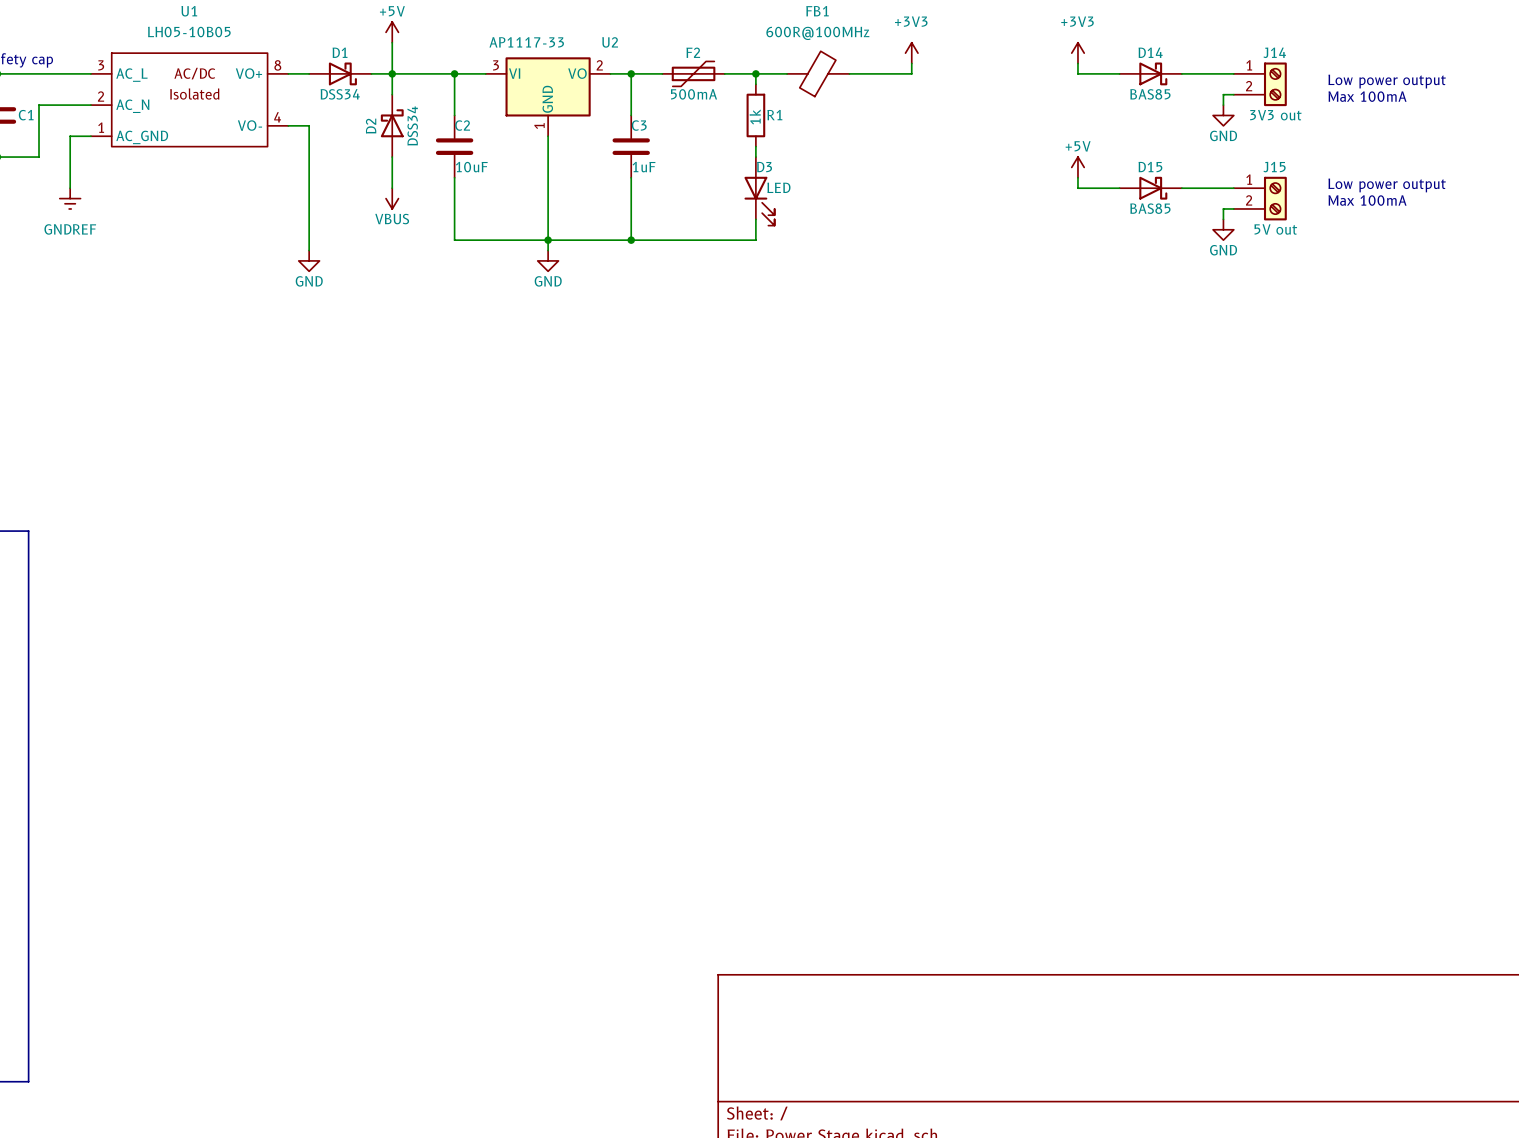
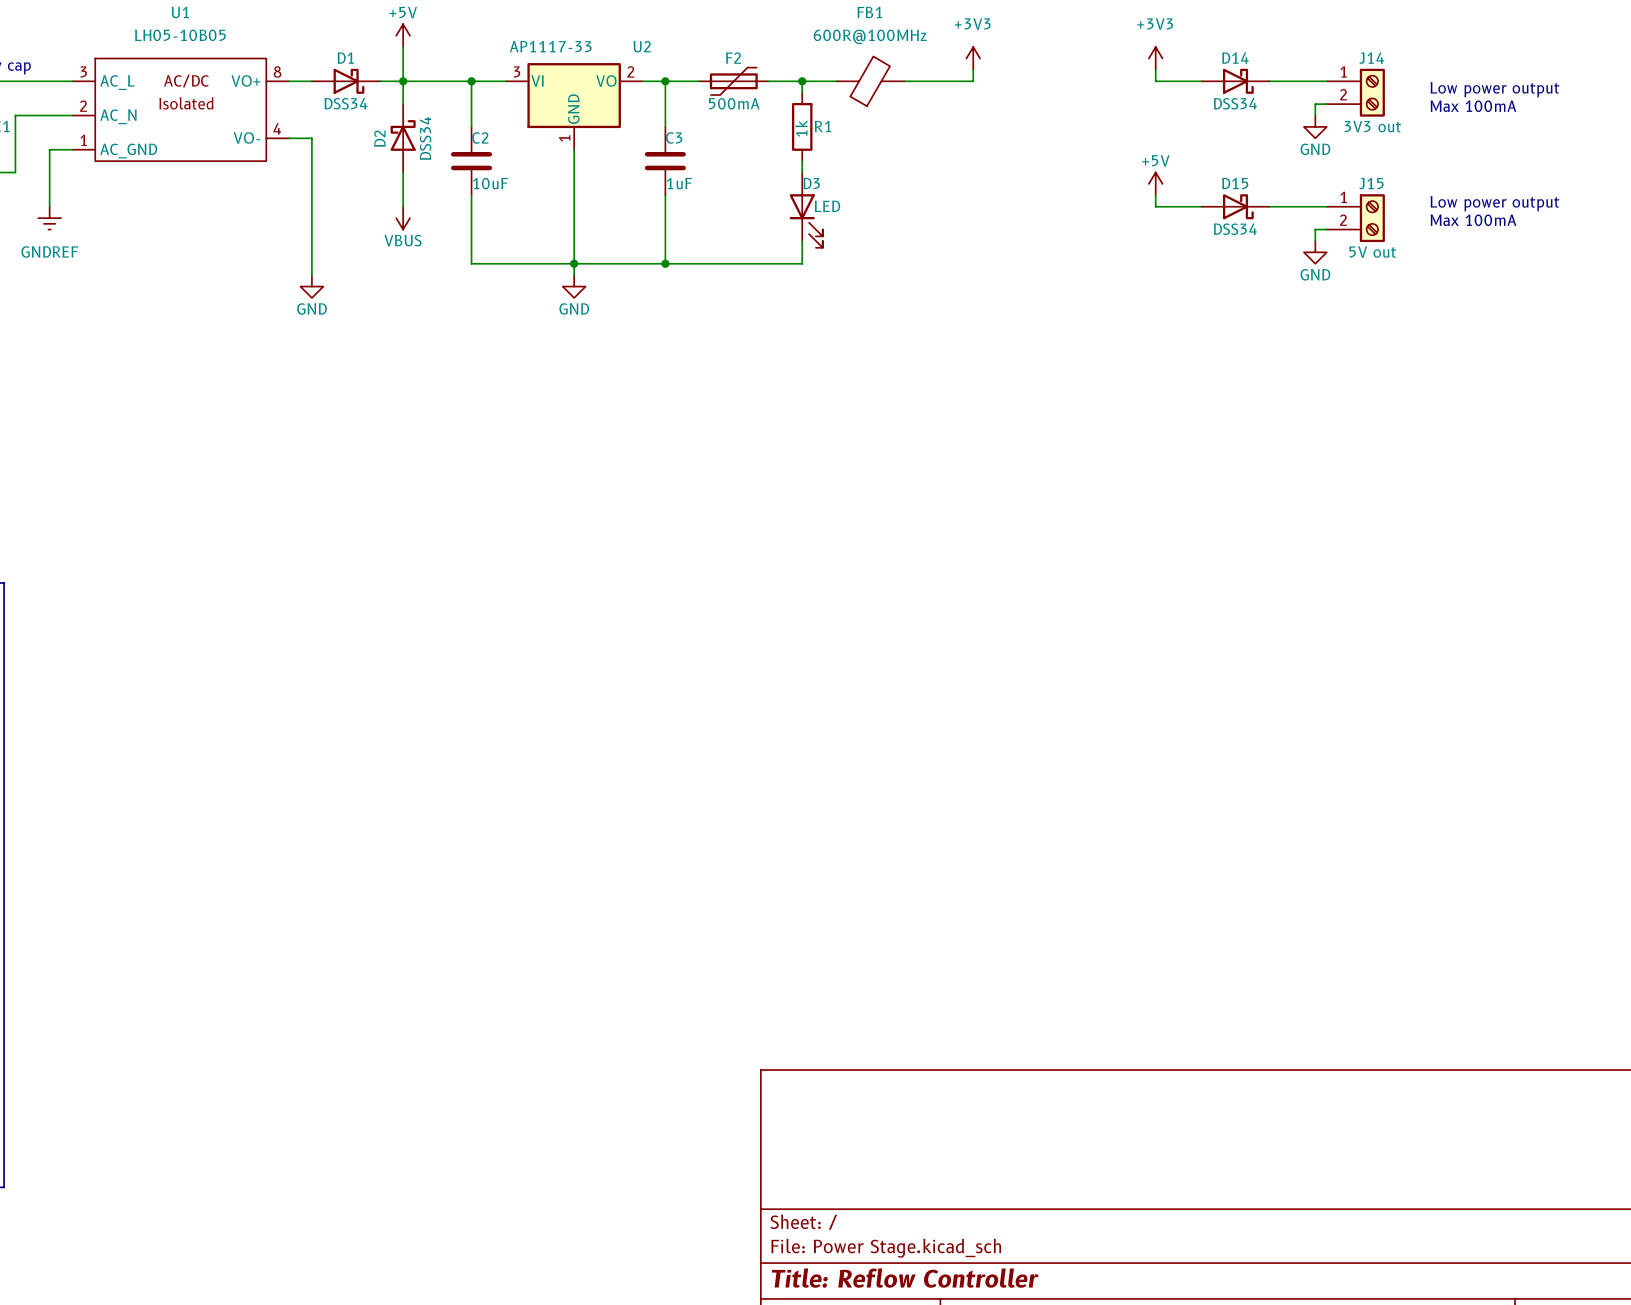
D14 value: BAS85 (1150, 94) -> DSS34 (1235, 103)
D15 value: BAS85 (1150, 208) -> DSS34 (1235, 229)

